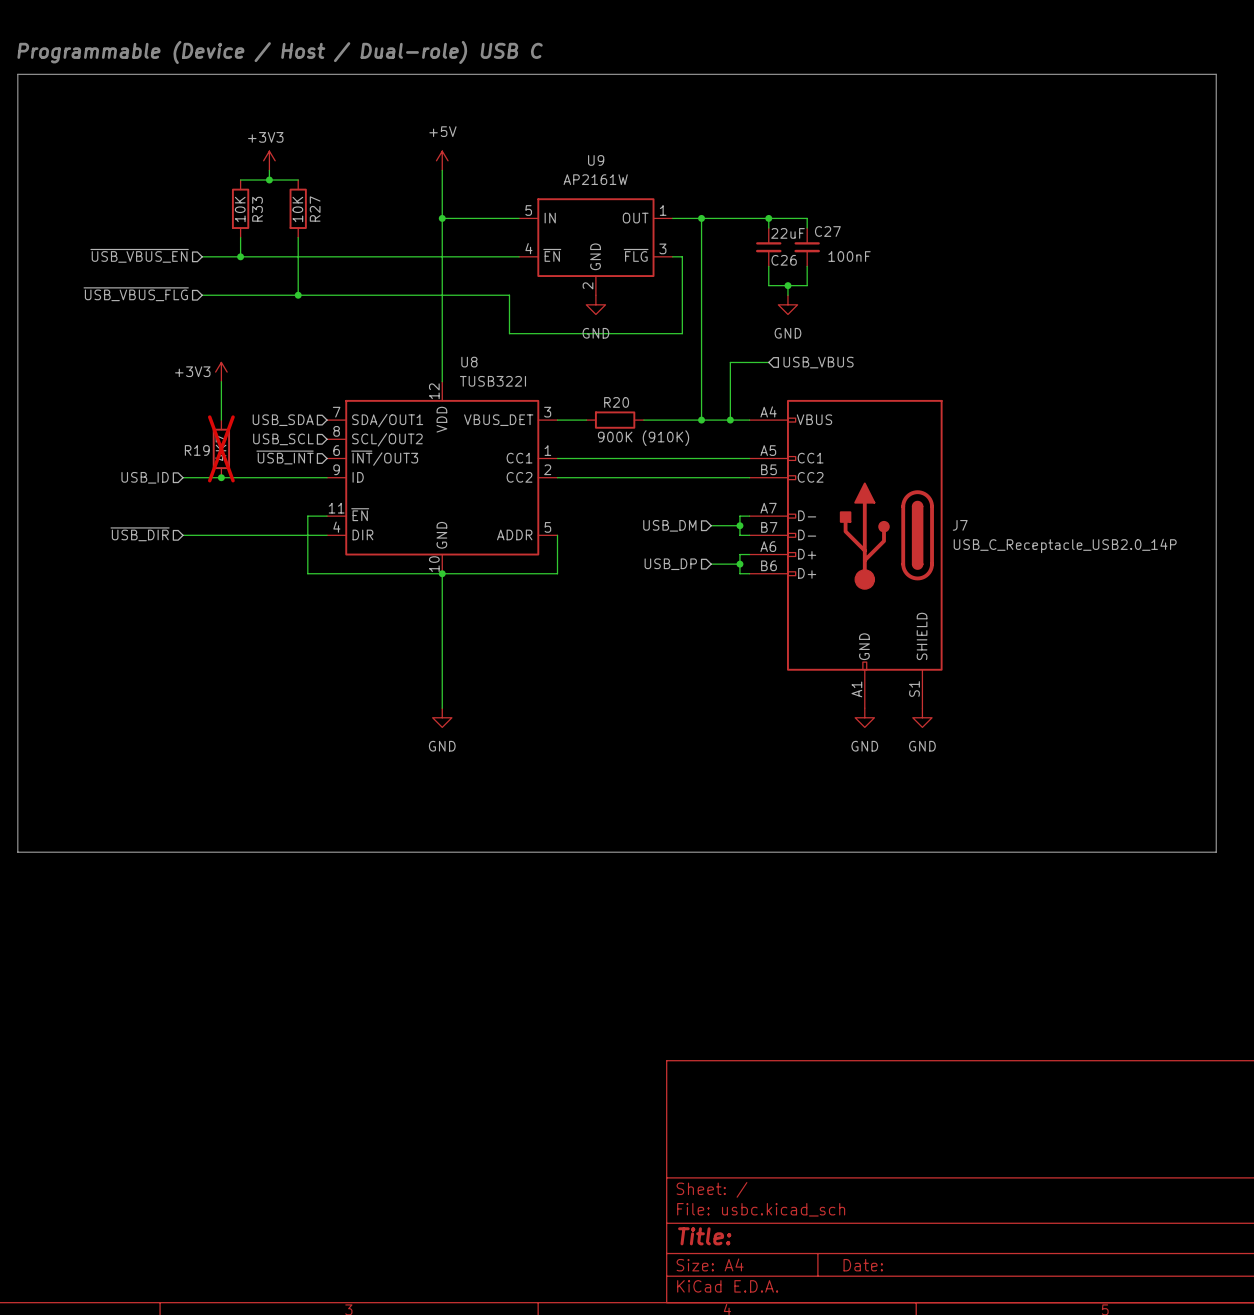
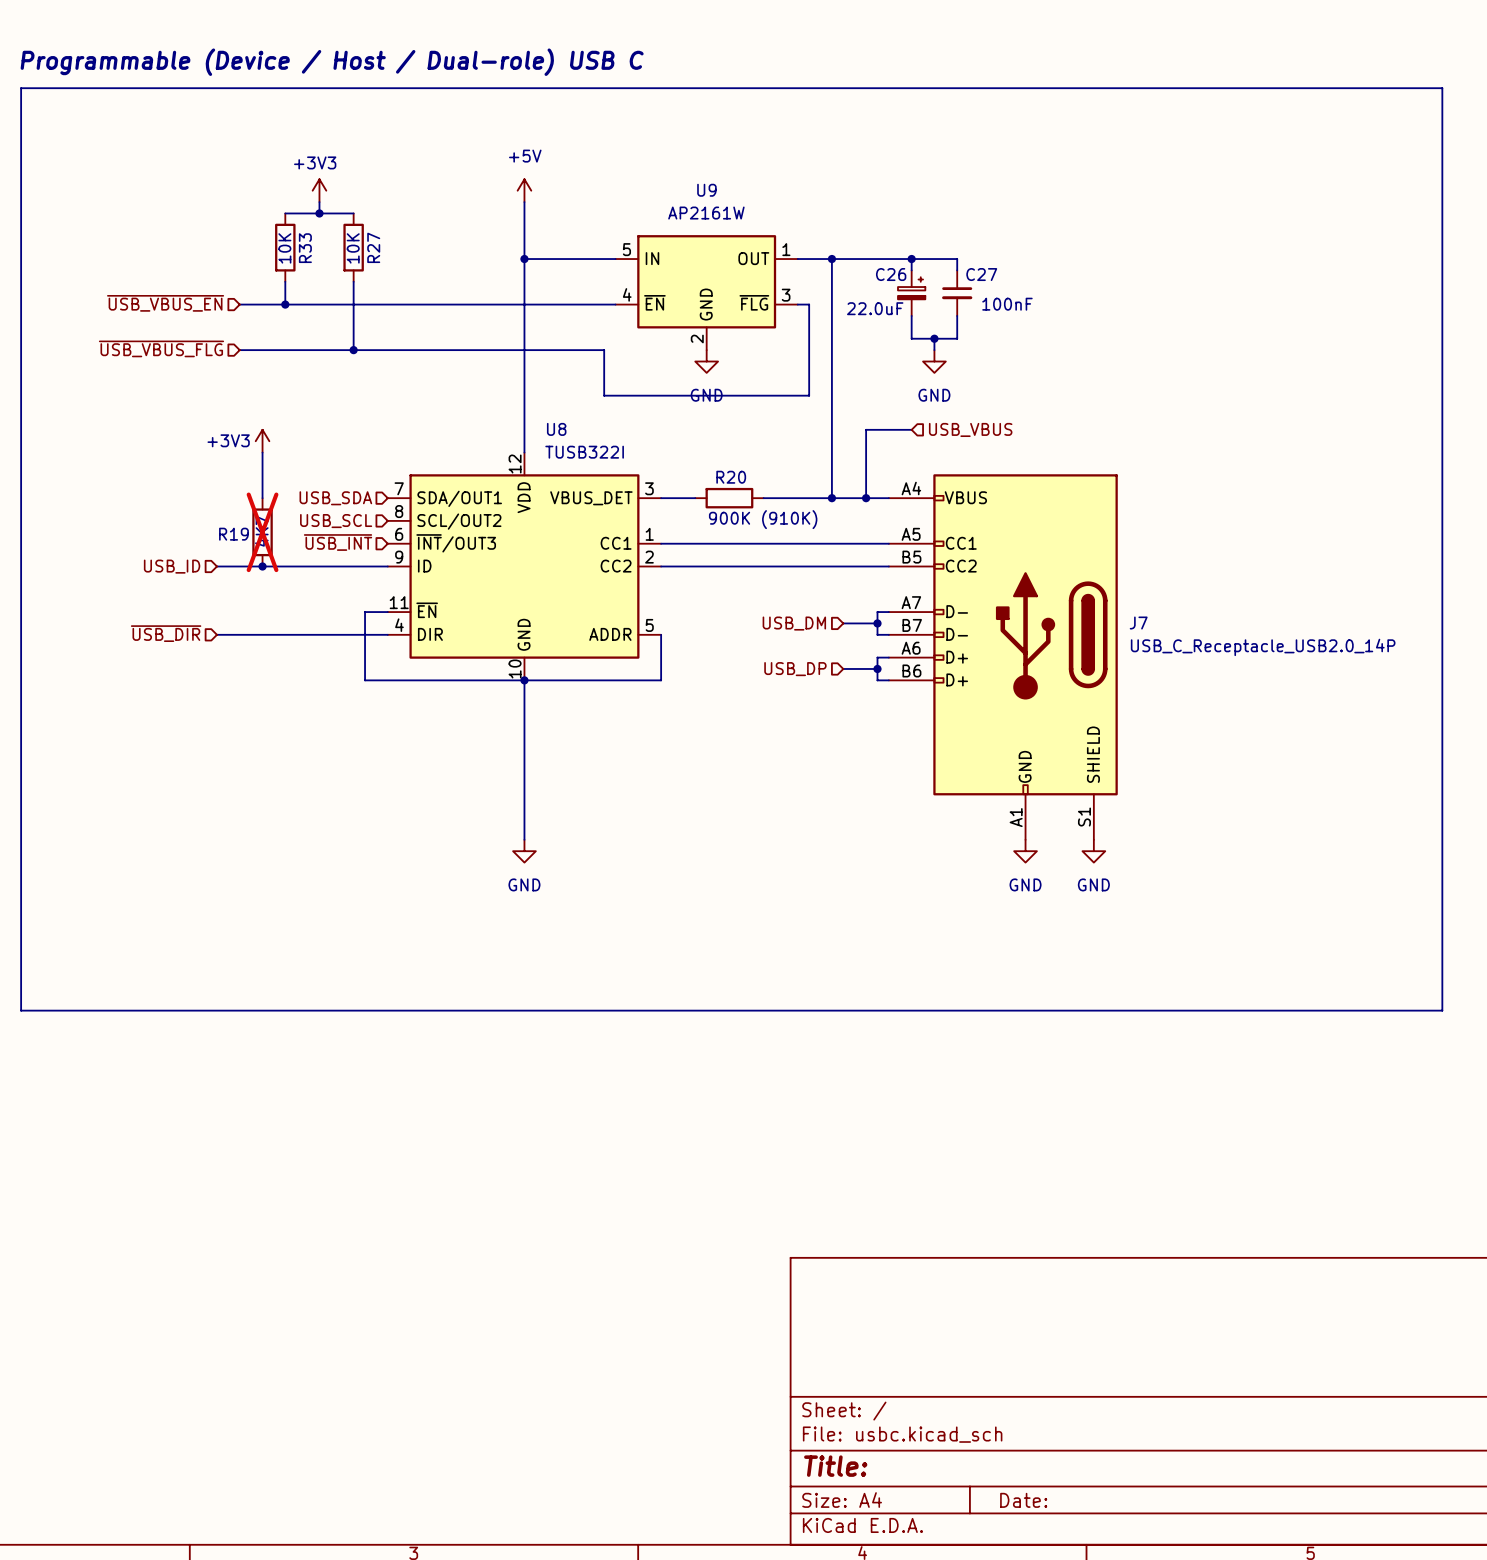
C26 symbol: [755, 228, 782, 267] -> [897, 270, 926, 316]
C26 value: 22uF (787, 233) -> 22.0uF (875, 308)
C26 name position: C26 (784, 260) -> C26 (891, 274)

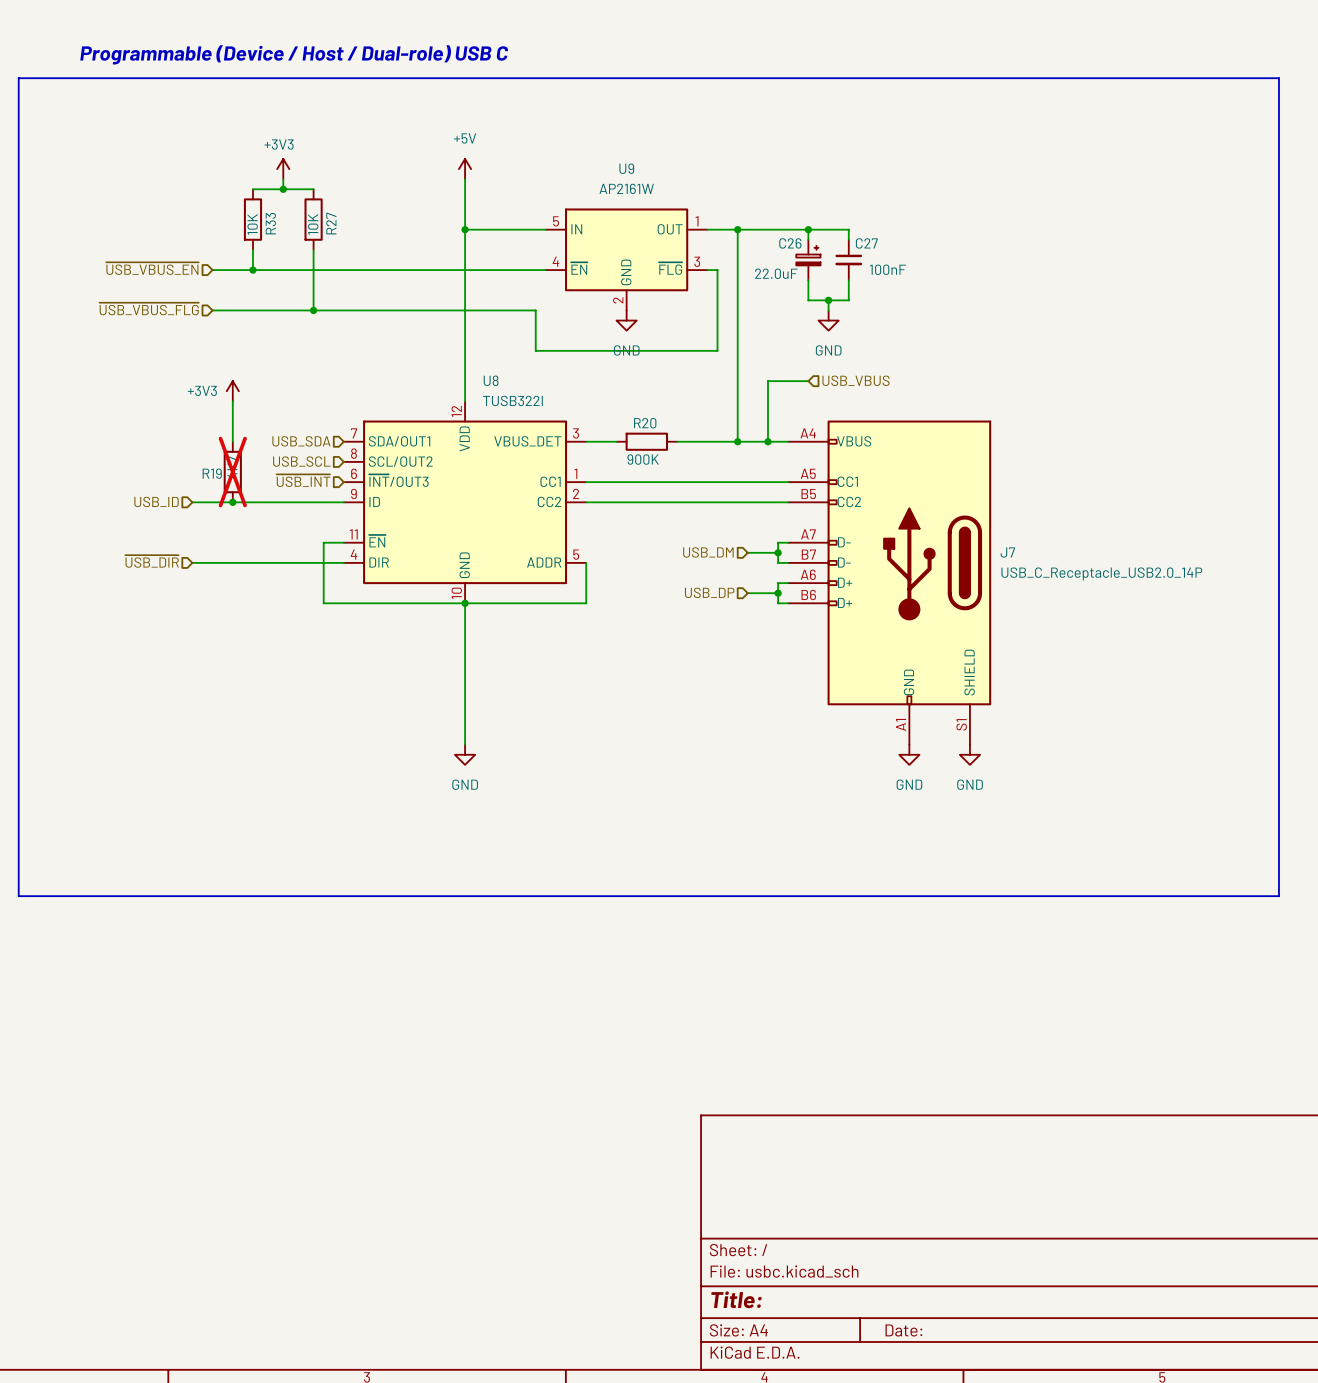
R20 value: 900K (910K) (763, 519) -> 900K (643, 459)

